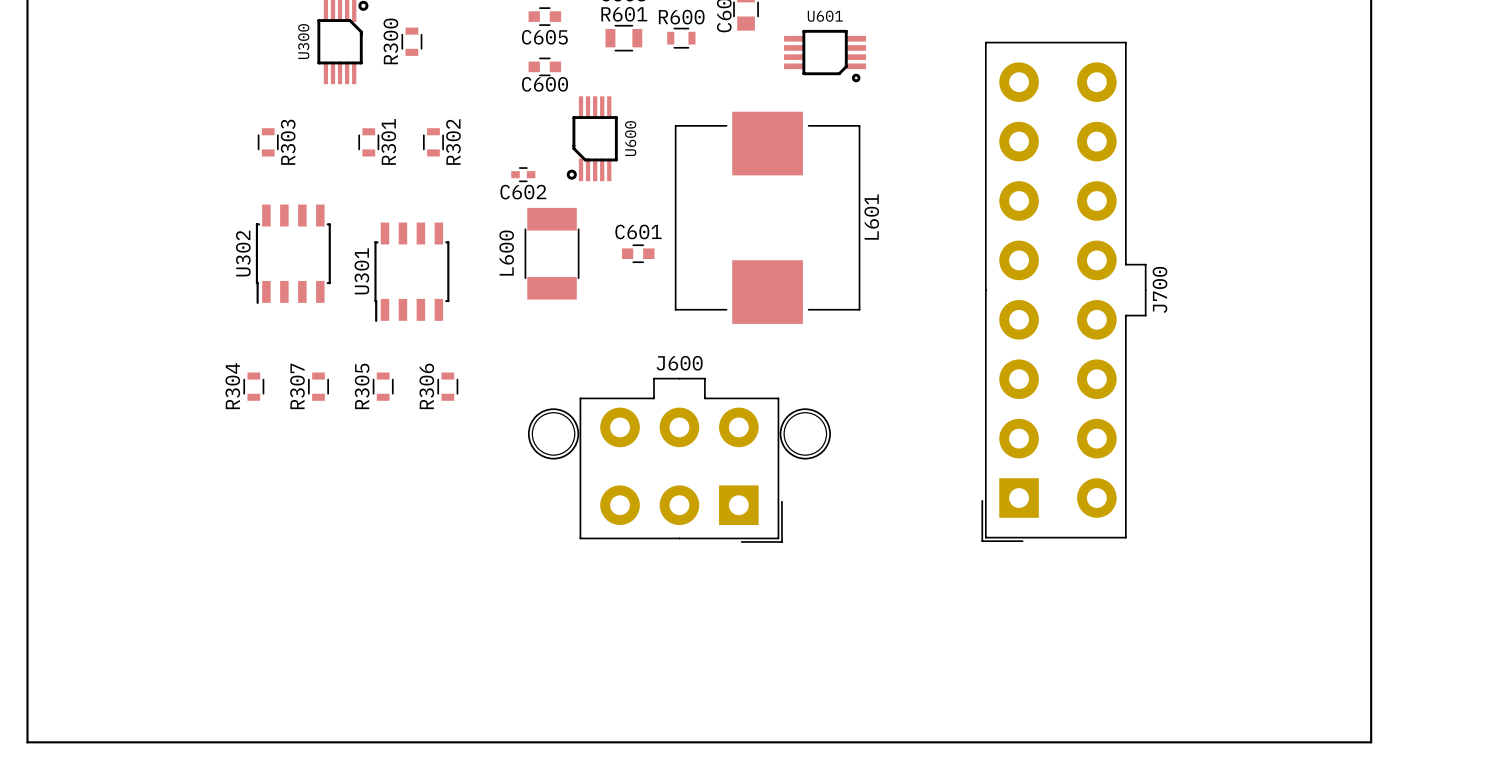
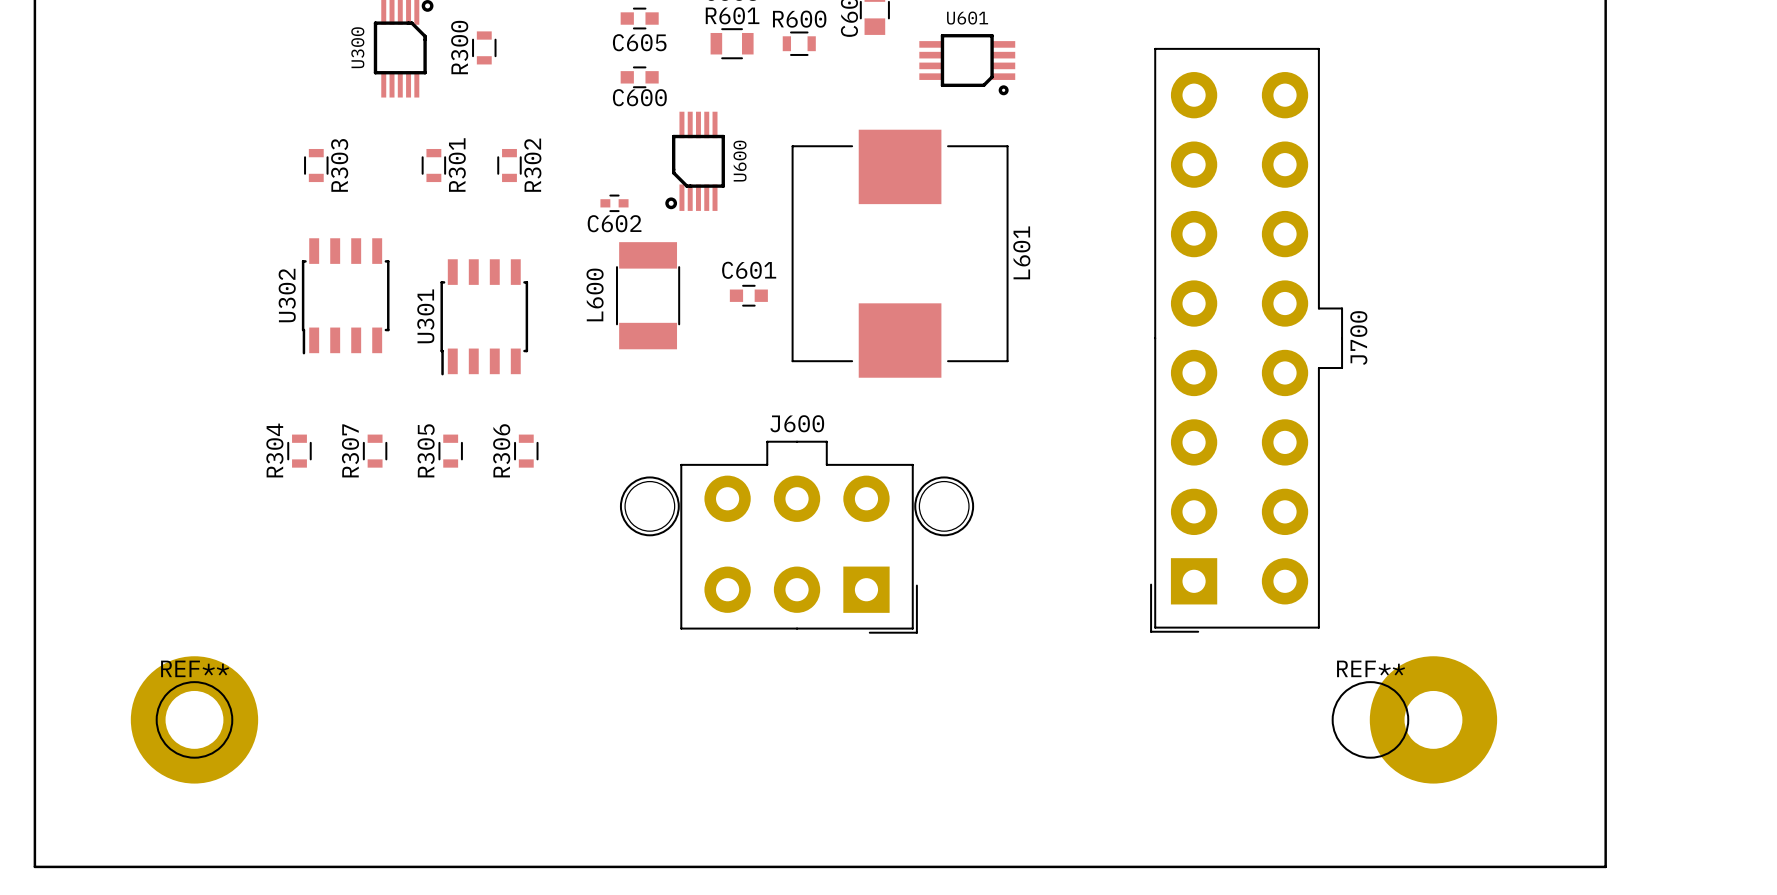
REF**: none -> (194, 719)
REF**: none -> (1414, 719)

